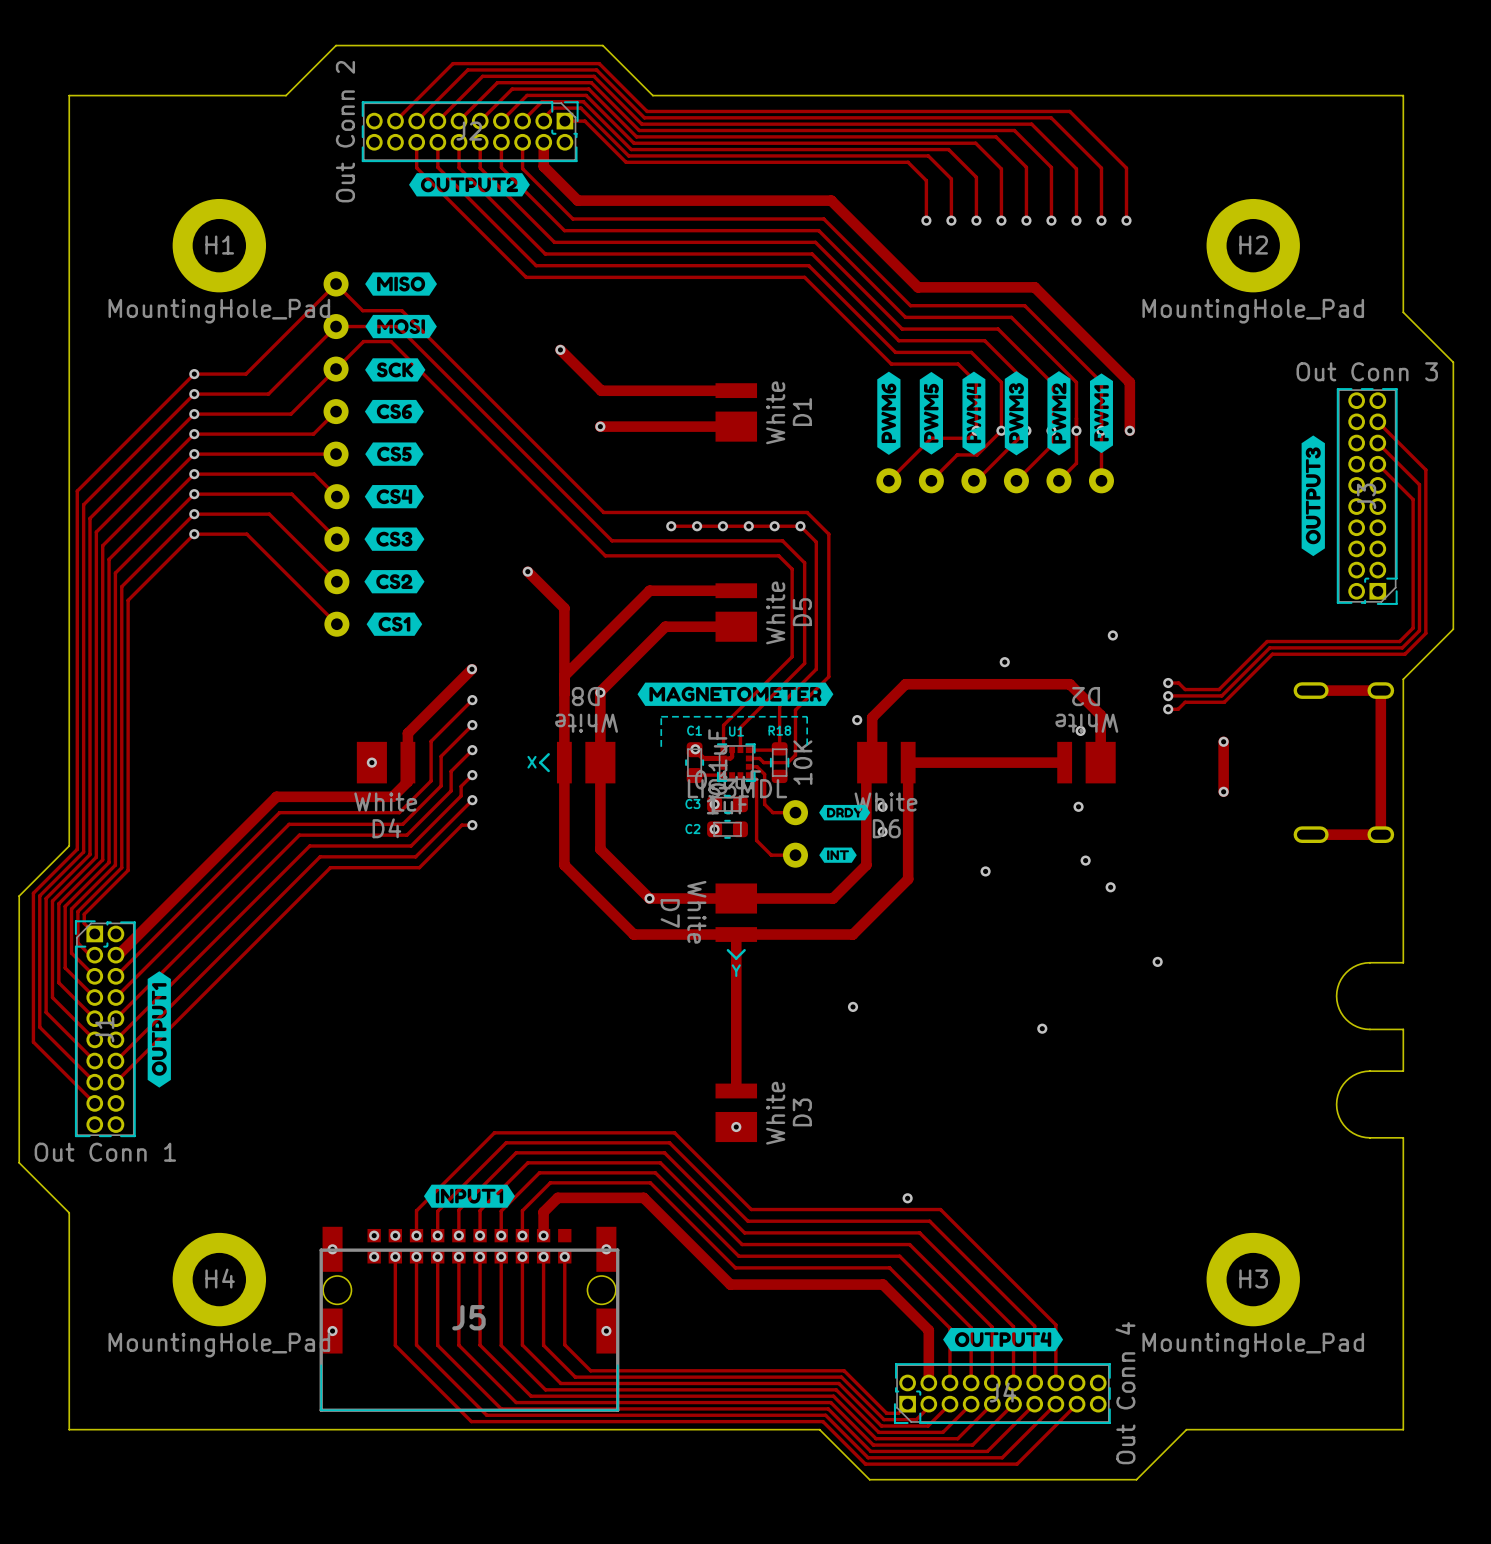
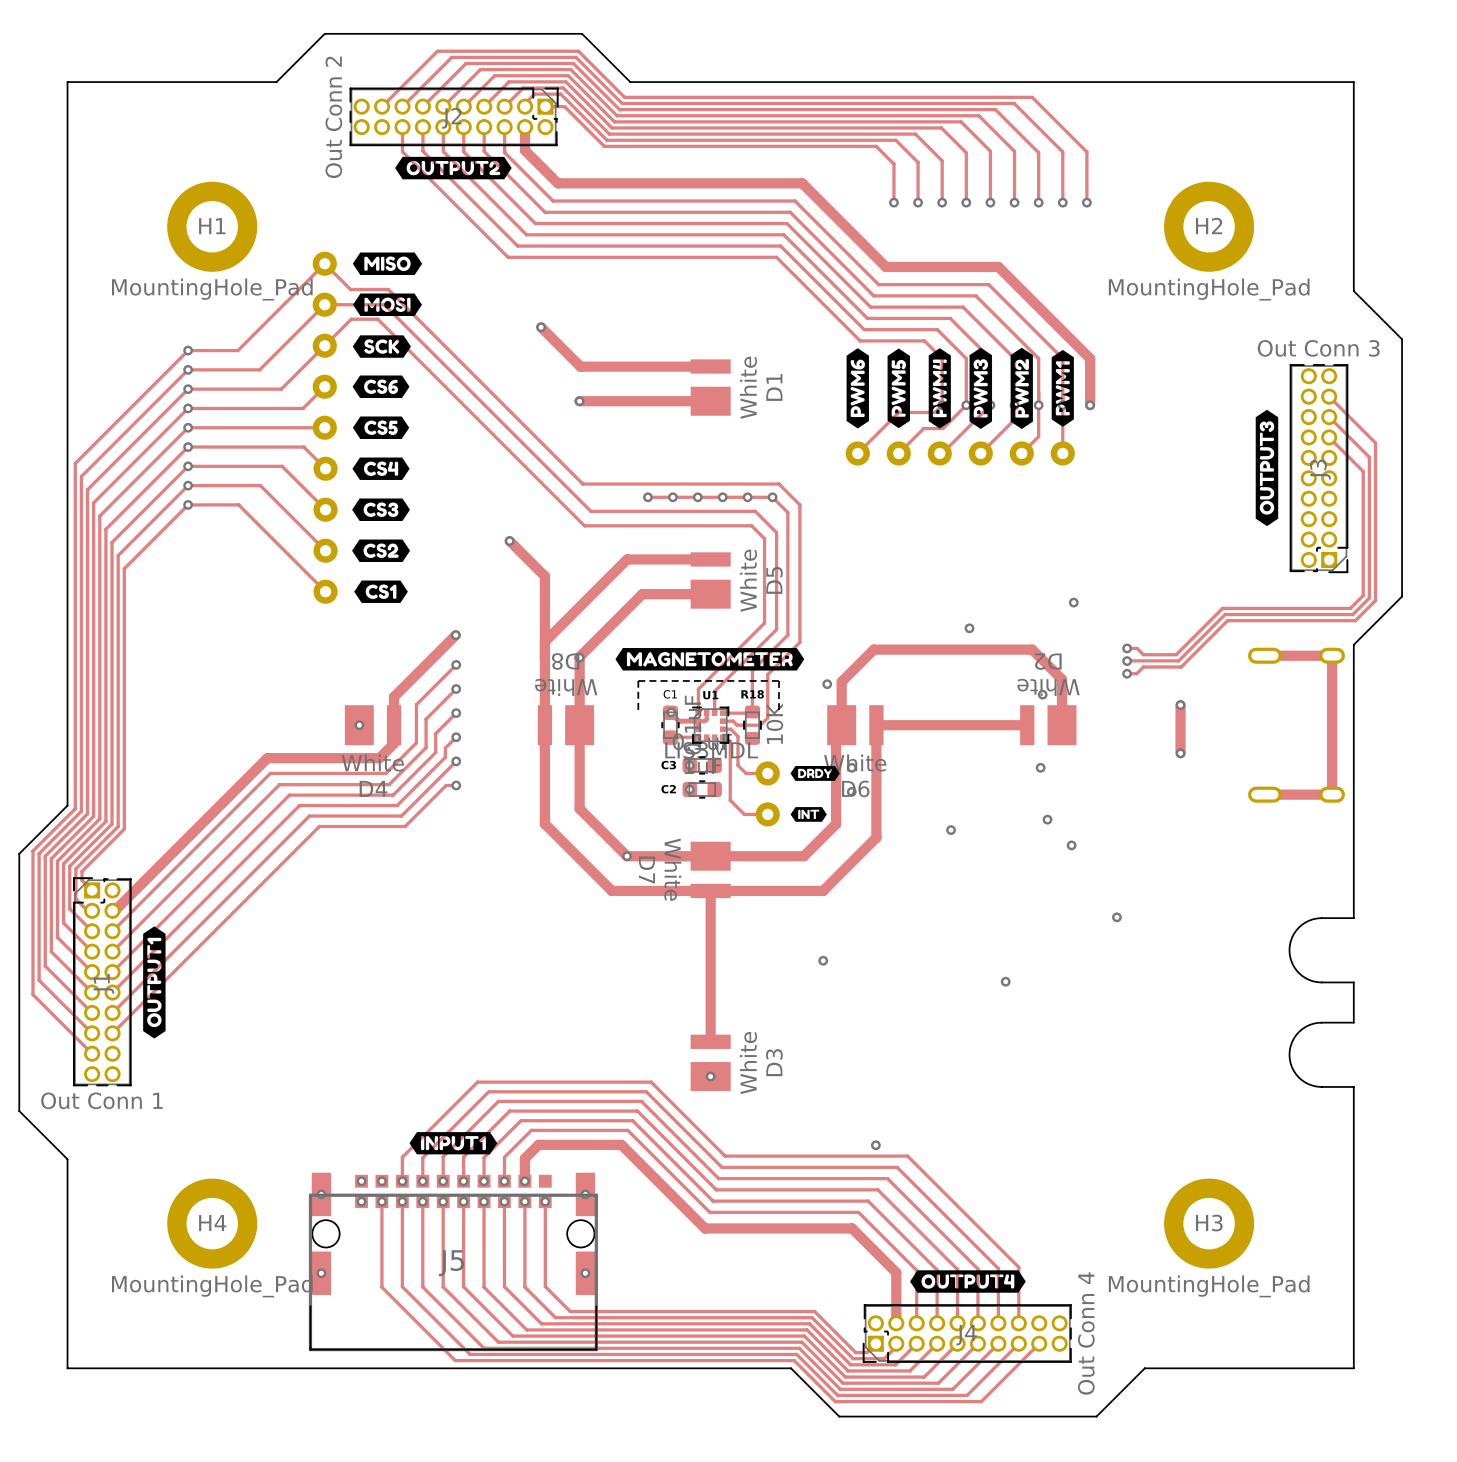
line: (548, 754) (540, 762) (548, 770) -> none
text: X (532, 762) -> none
line: (727, 950) (736, 958) (744, 950) -> none
text: Y (736, 970) -> none

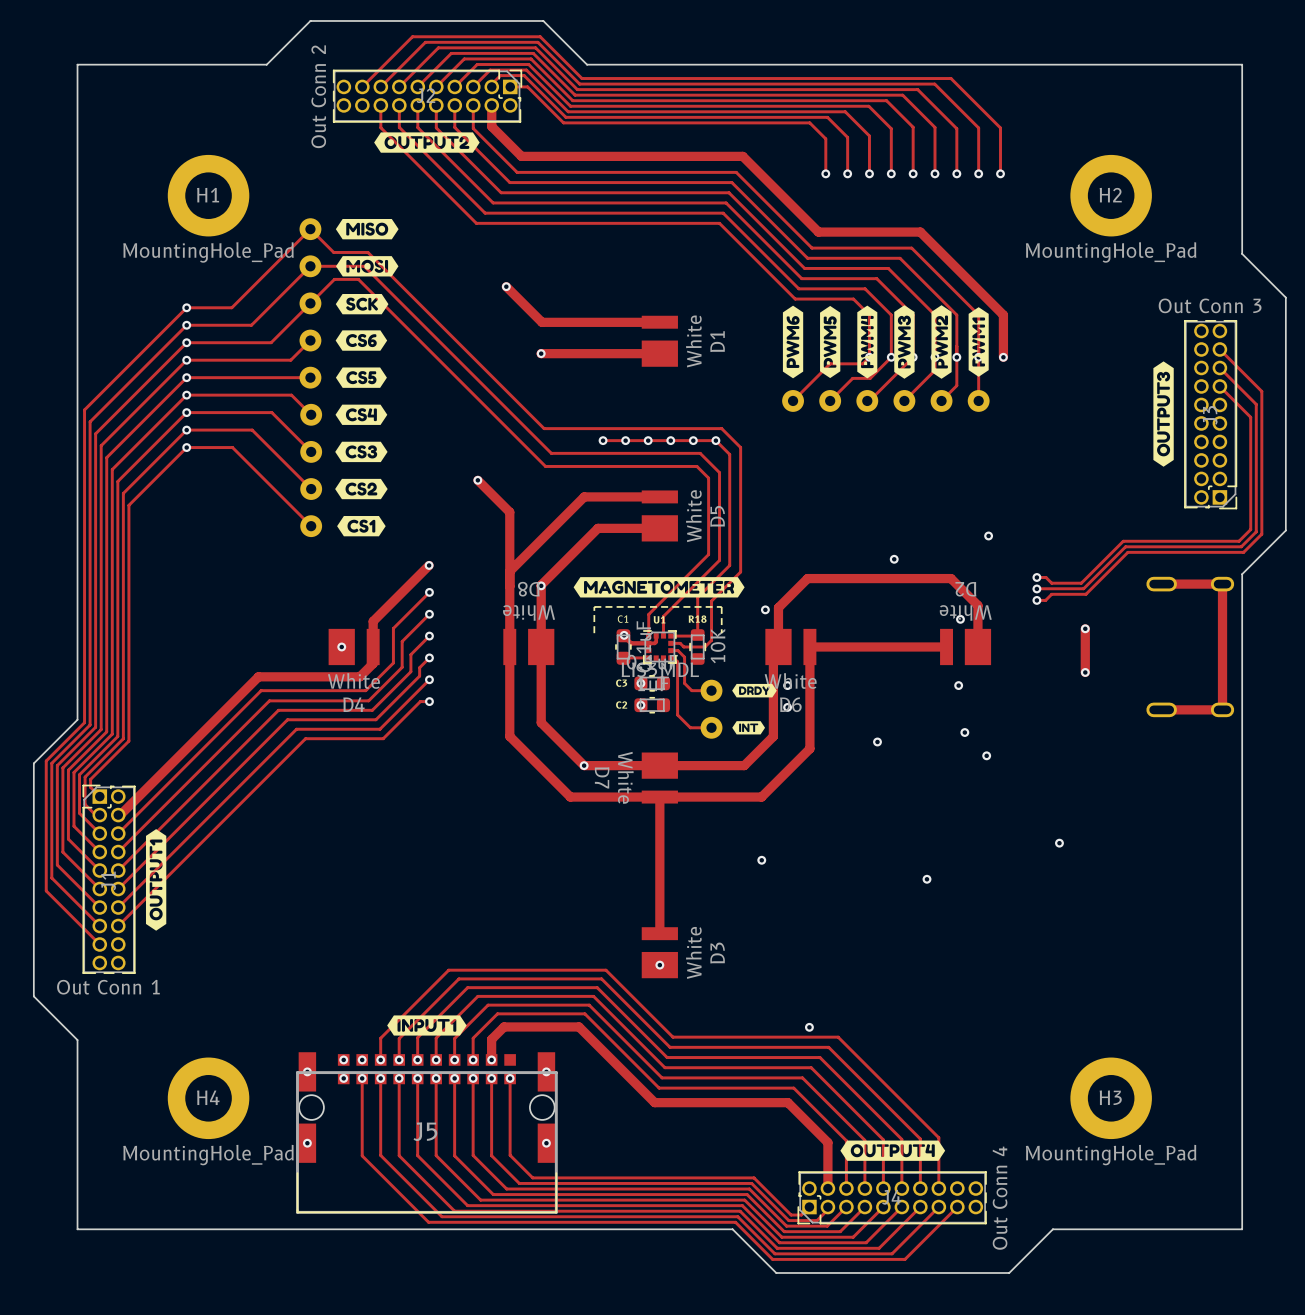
via position: (1116, 917) -> (1059, 843)
board edge: (1353, 918) (1317, 918) (1305, 922) (1293, 934) (1289, 950) (1293, 966) (1305, 978) (1317, 982) (1353, 982) -> (1242, 821) (1242, 879)
board edge: (1353, 1022) (1317, 1022) (1305, 1026) (1293, 1038) (1289, 1054) (1293, 1070) (1305, 1082) (1317, 1086) (1353, 1086) -> (1242, 916) (1242, 974)

